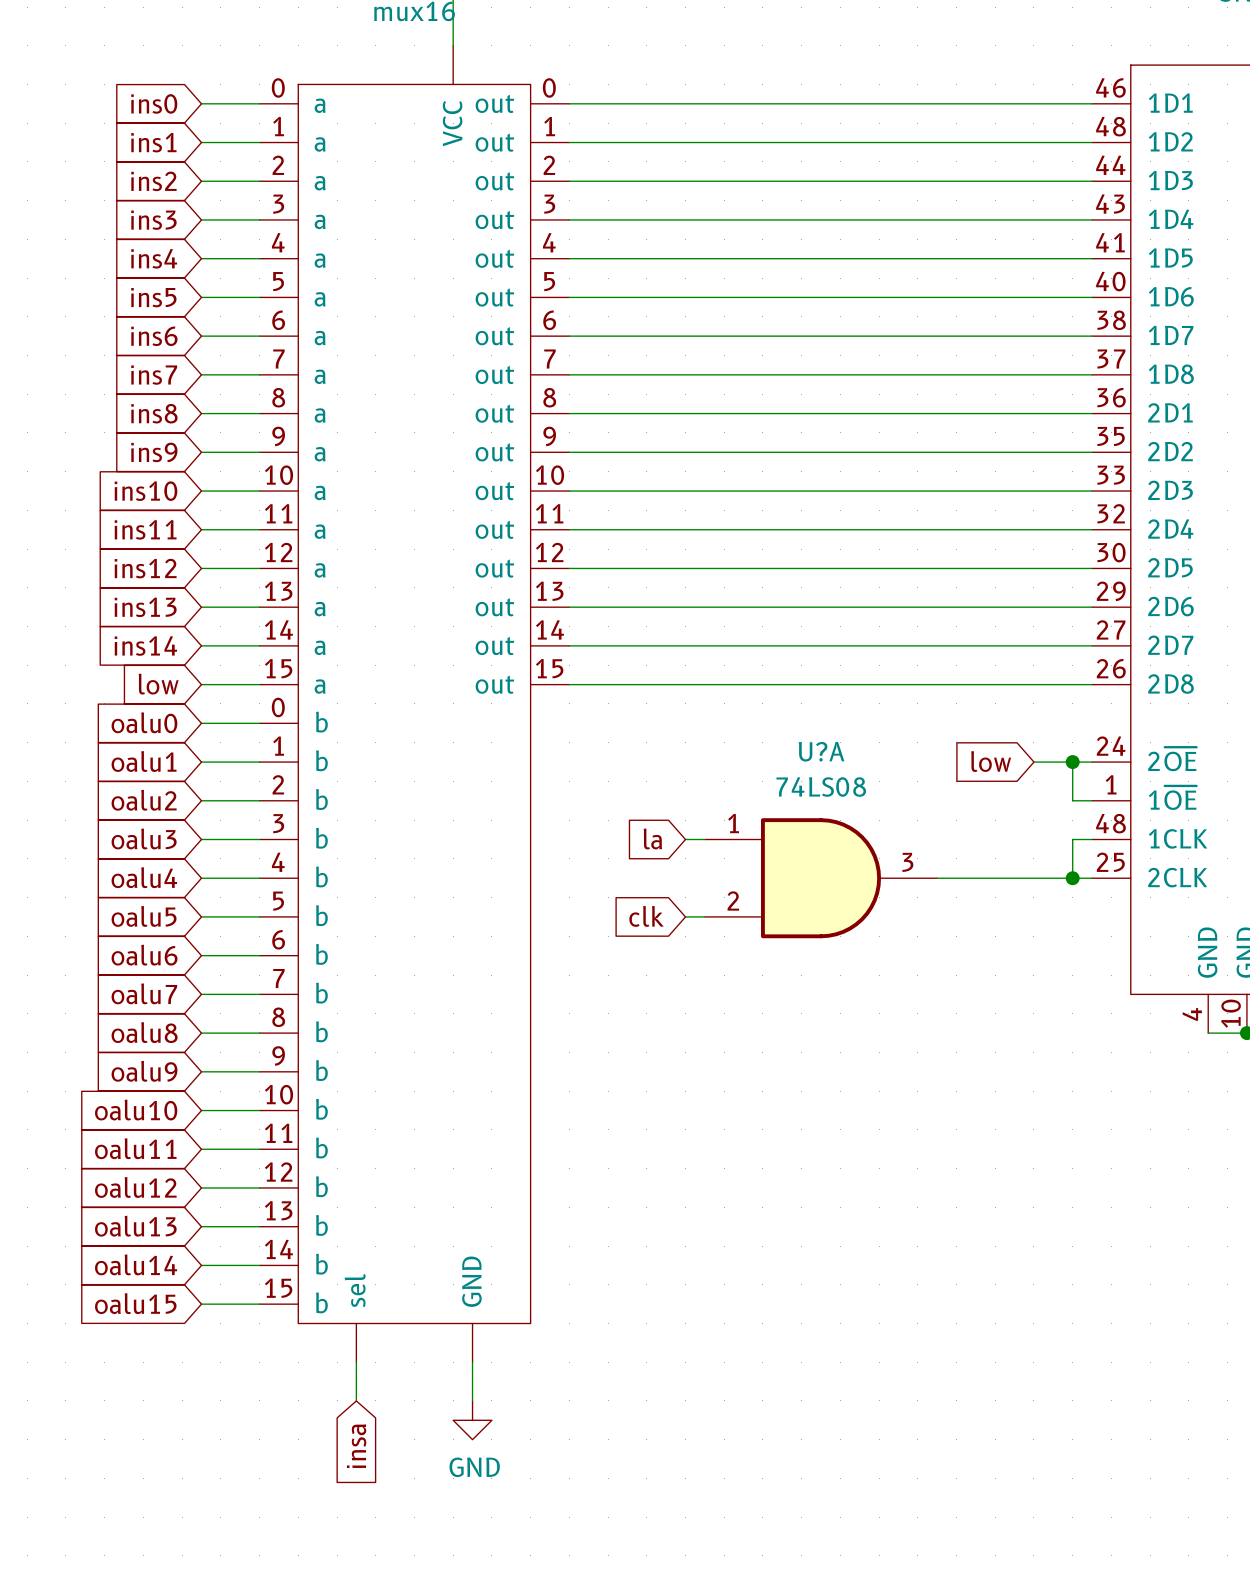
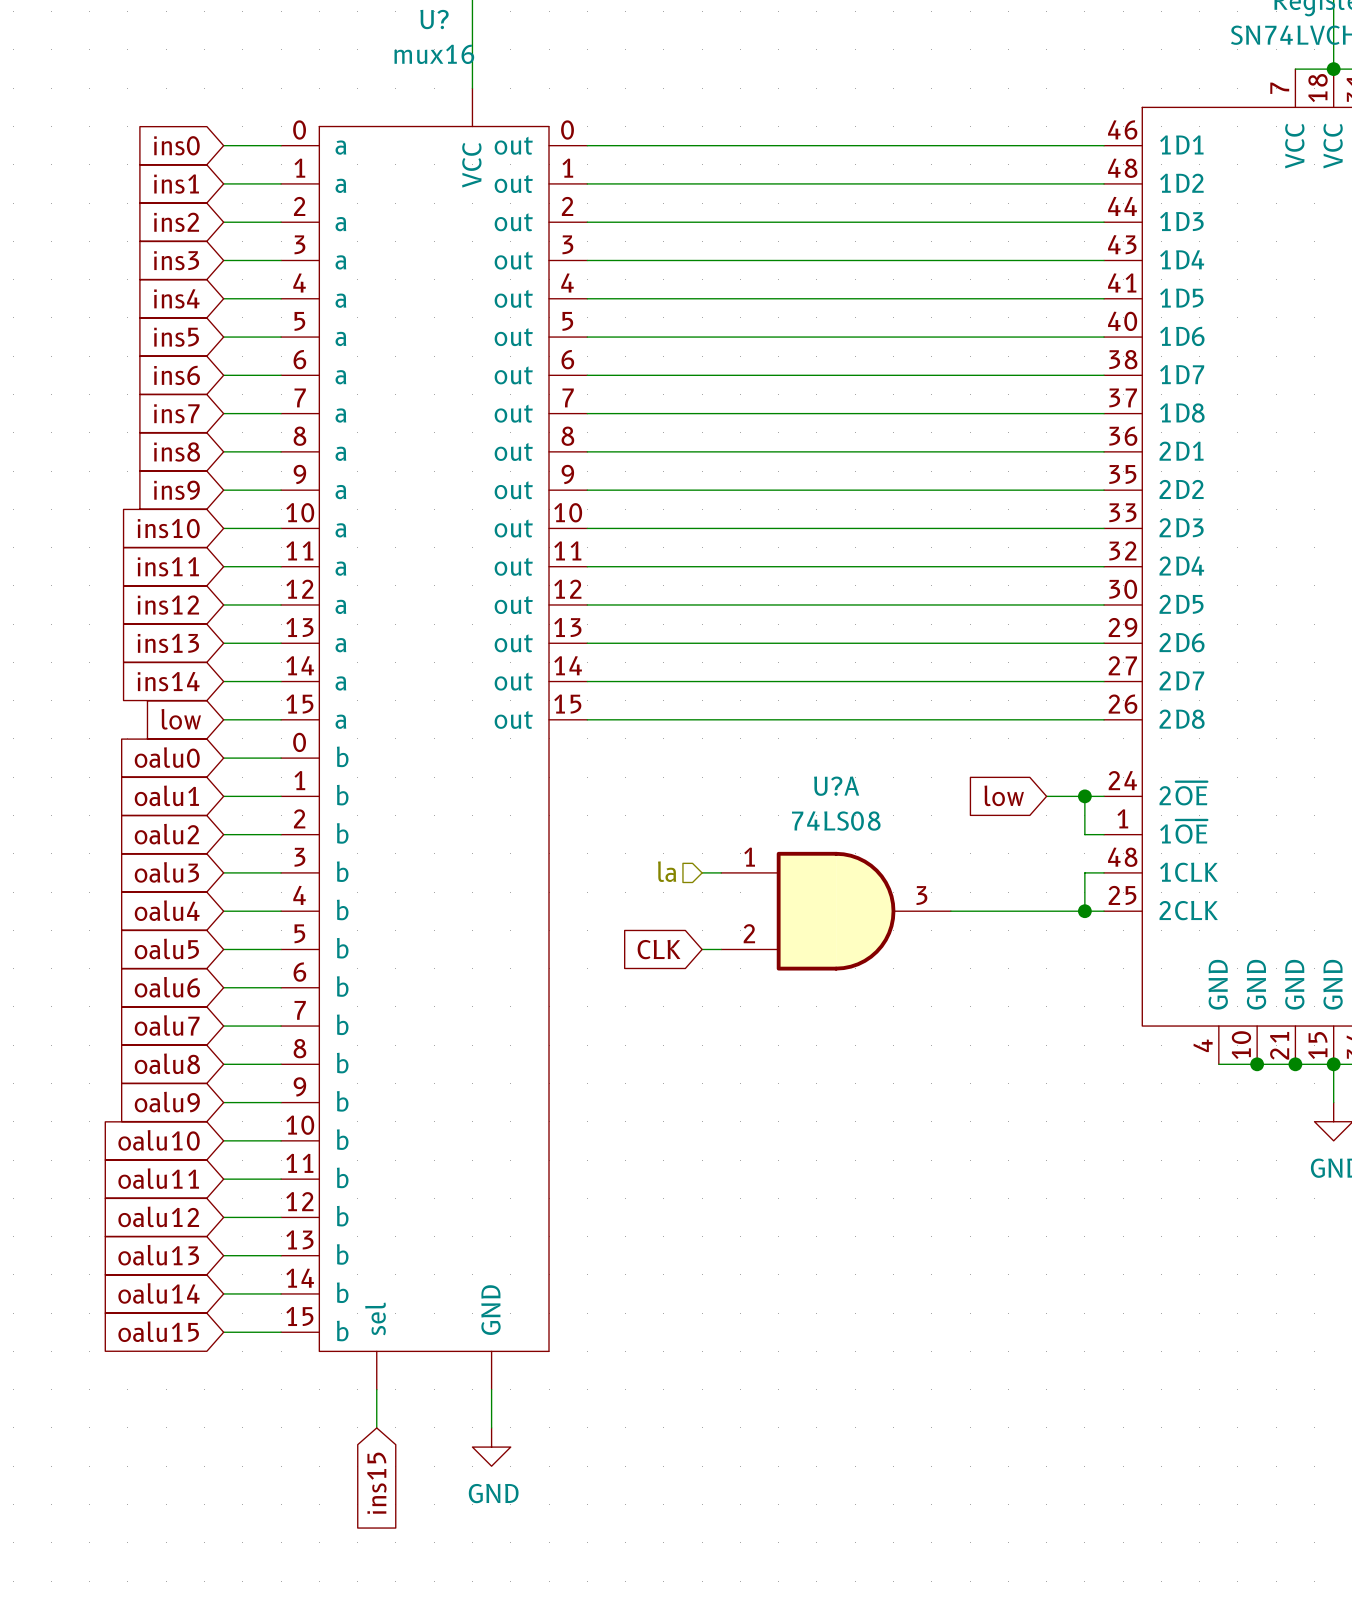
hierarchical label: none -> la (667, 871)
global label: la (652, 838) -> none
global label: clk (646, 916) -> CLK (659, 949)
global label: insa (356, 1446) -> ins15 (376, 1483)

